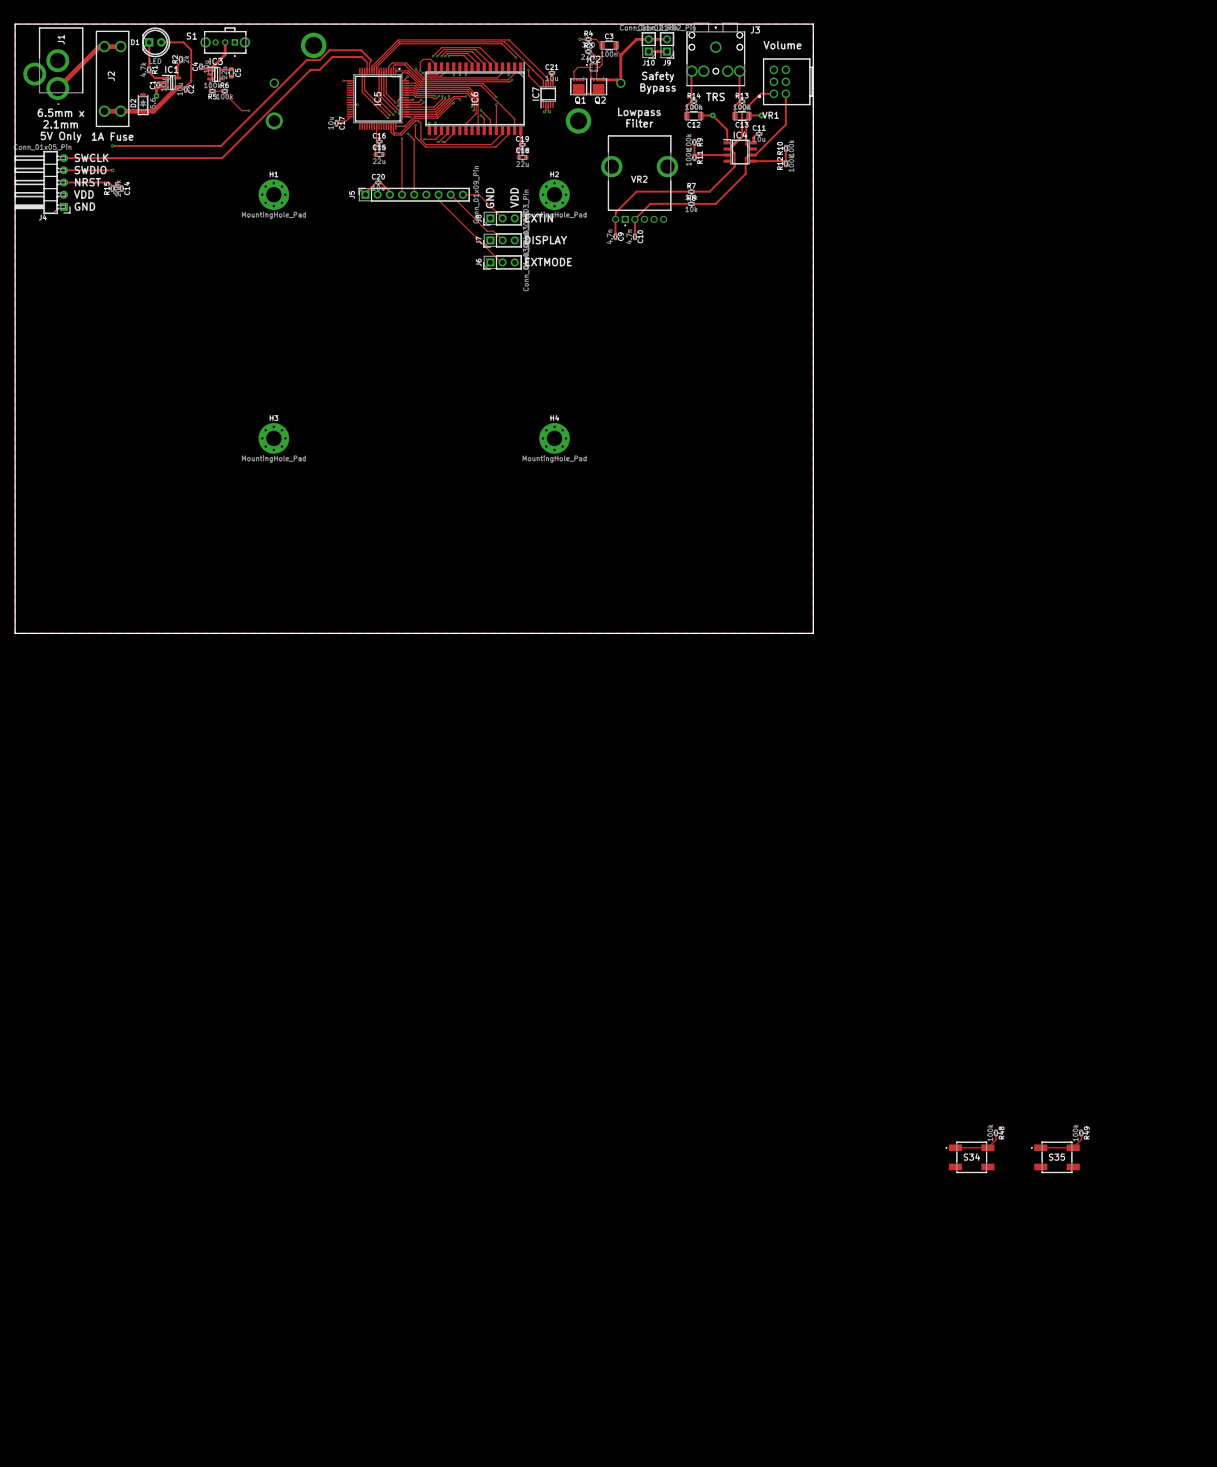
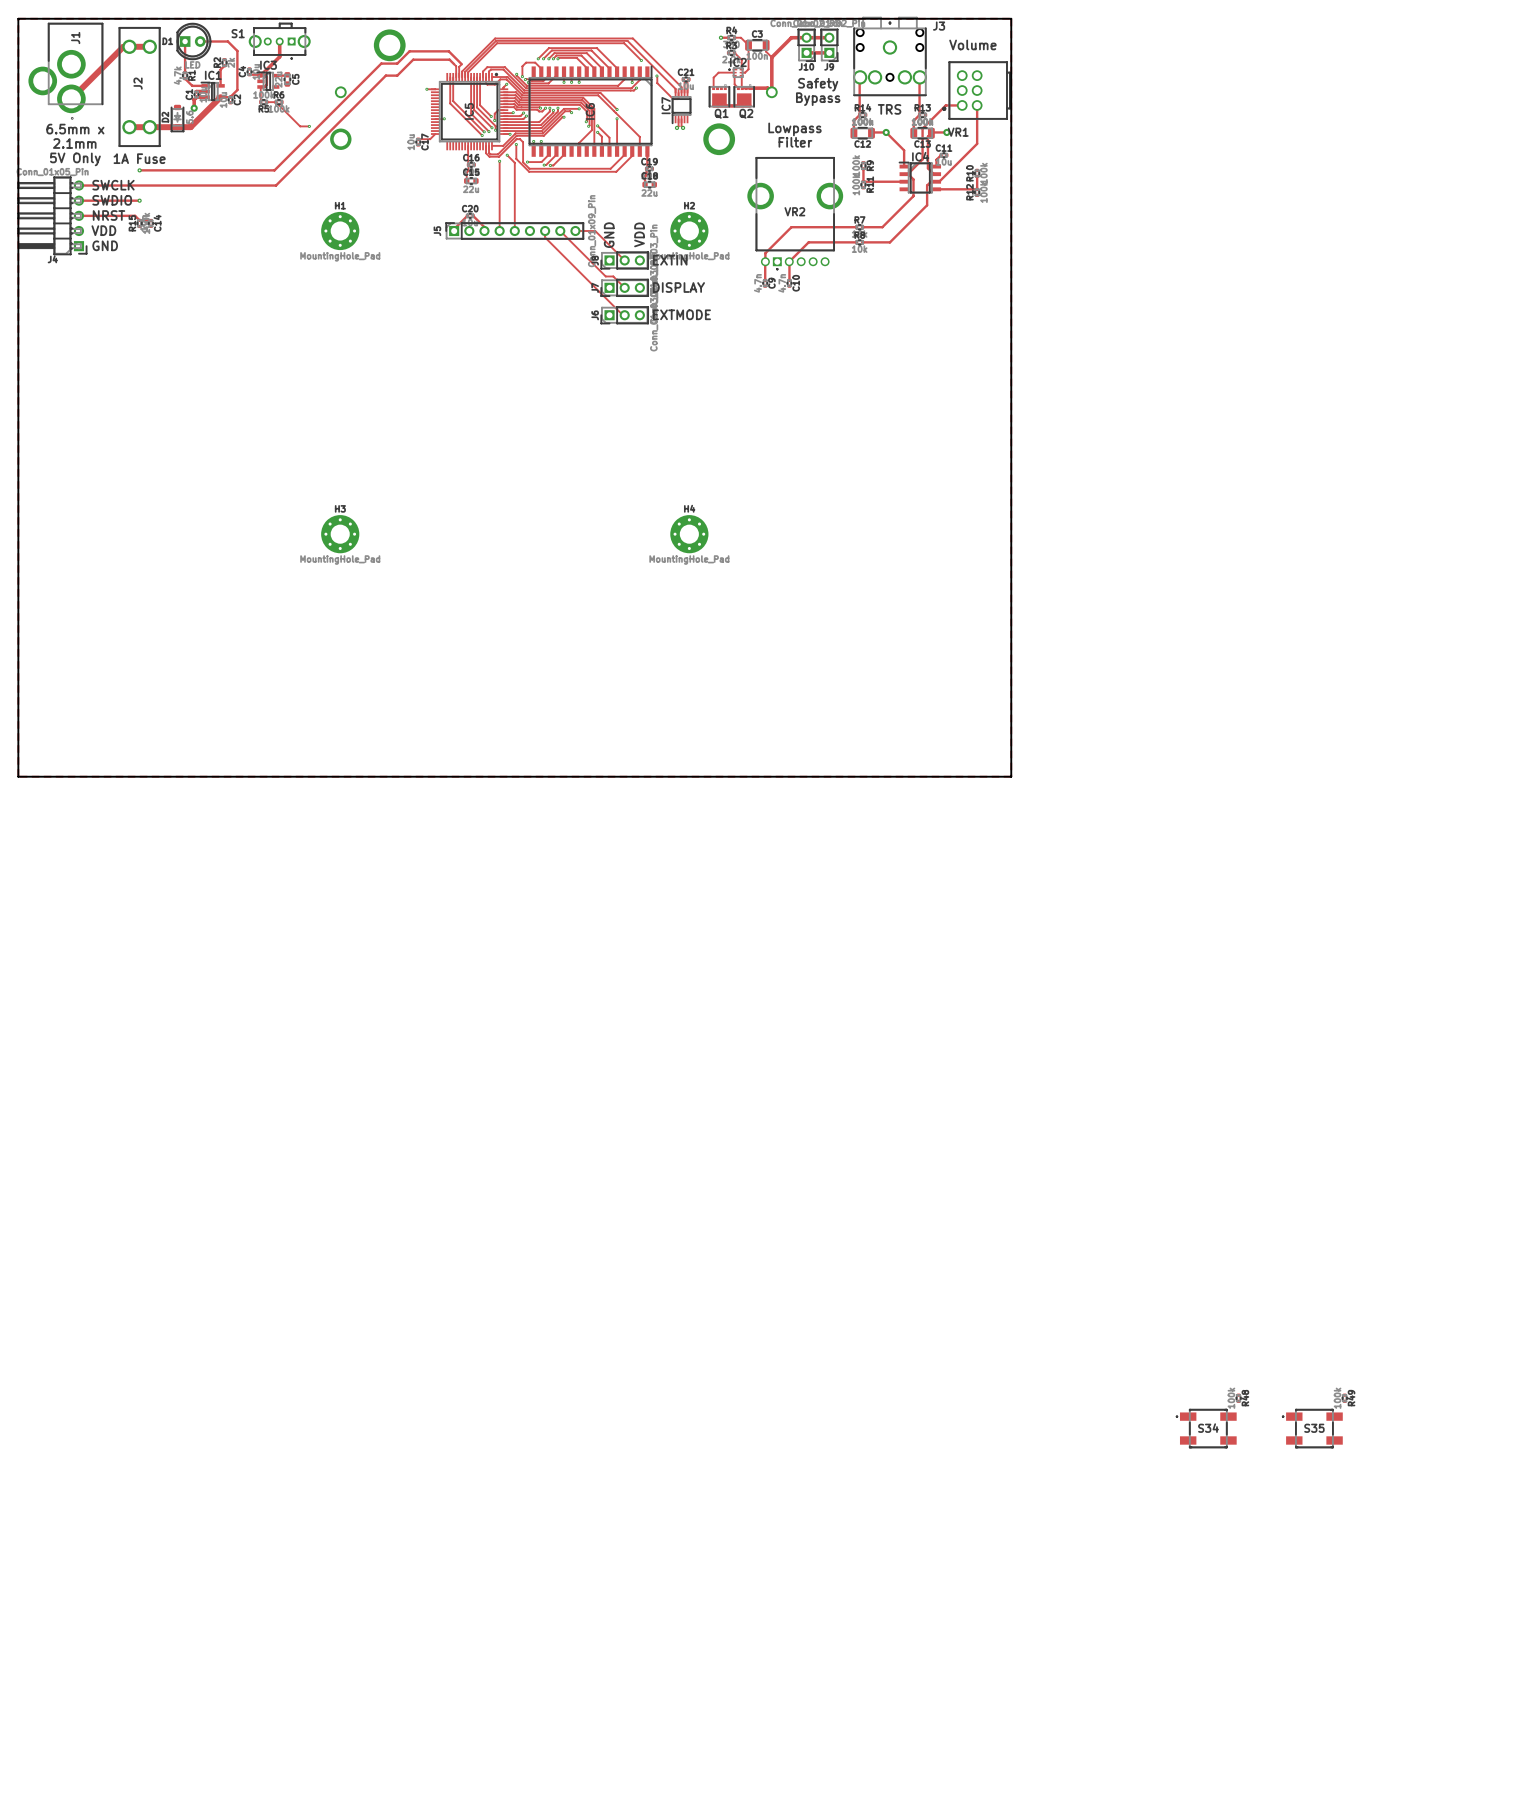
track: (996, 1135) (996, 1139) (987, 1147) (955, 1147) -> none
track: (1081, 1135) (1081, 1139) (1073, 1147) (1040, 1147) -> none

